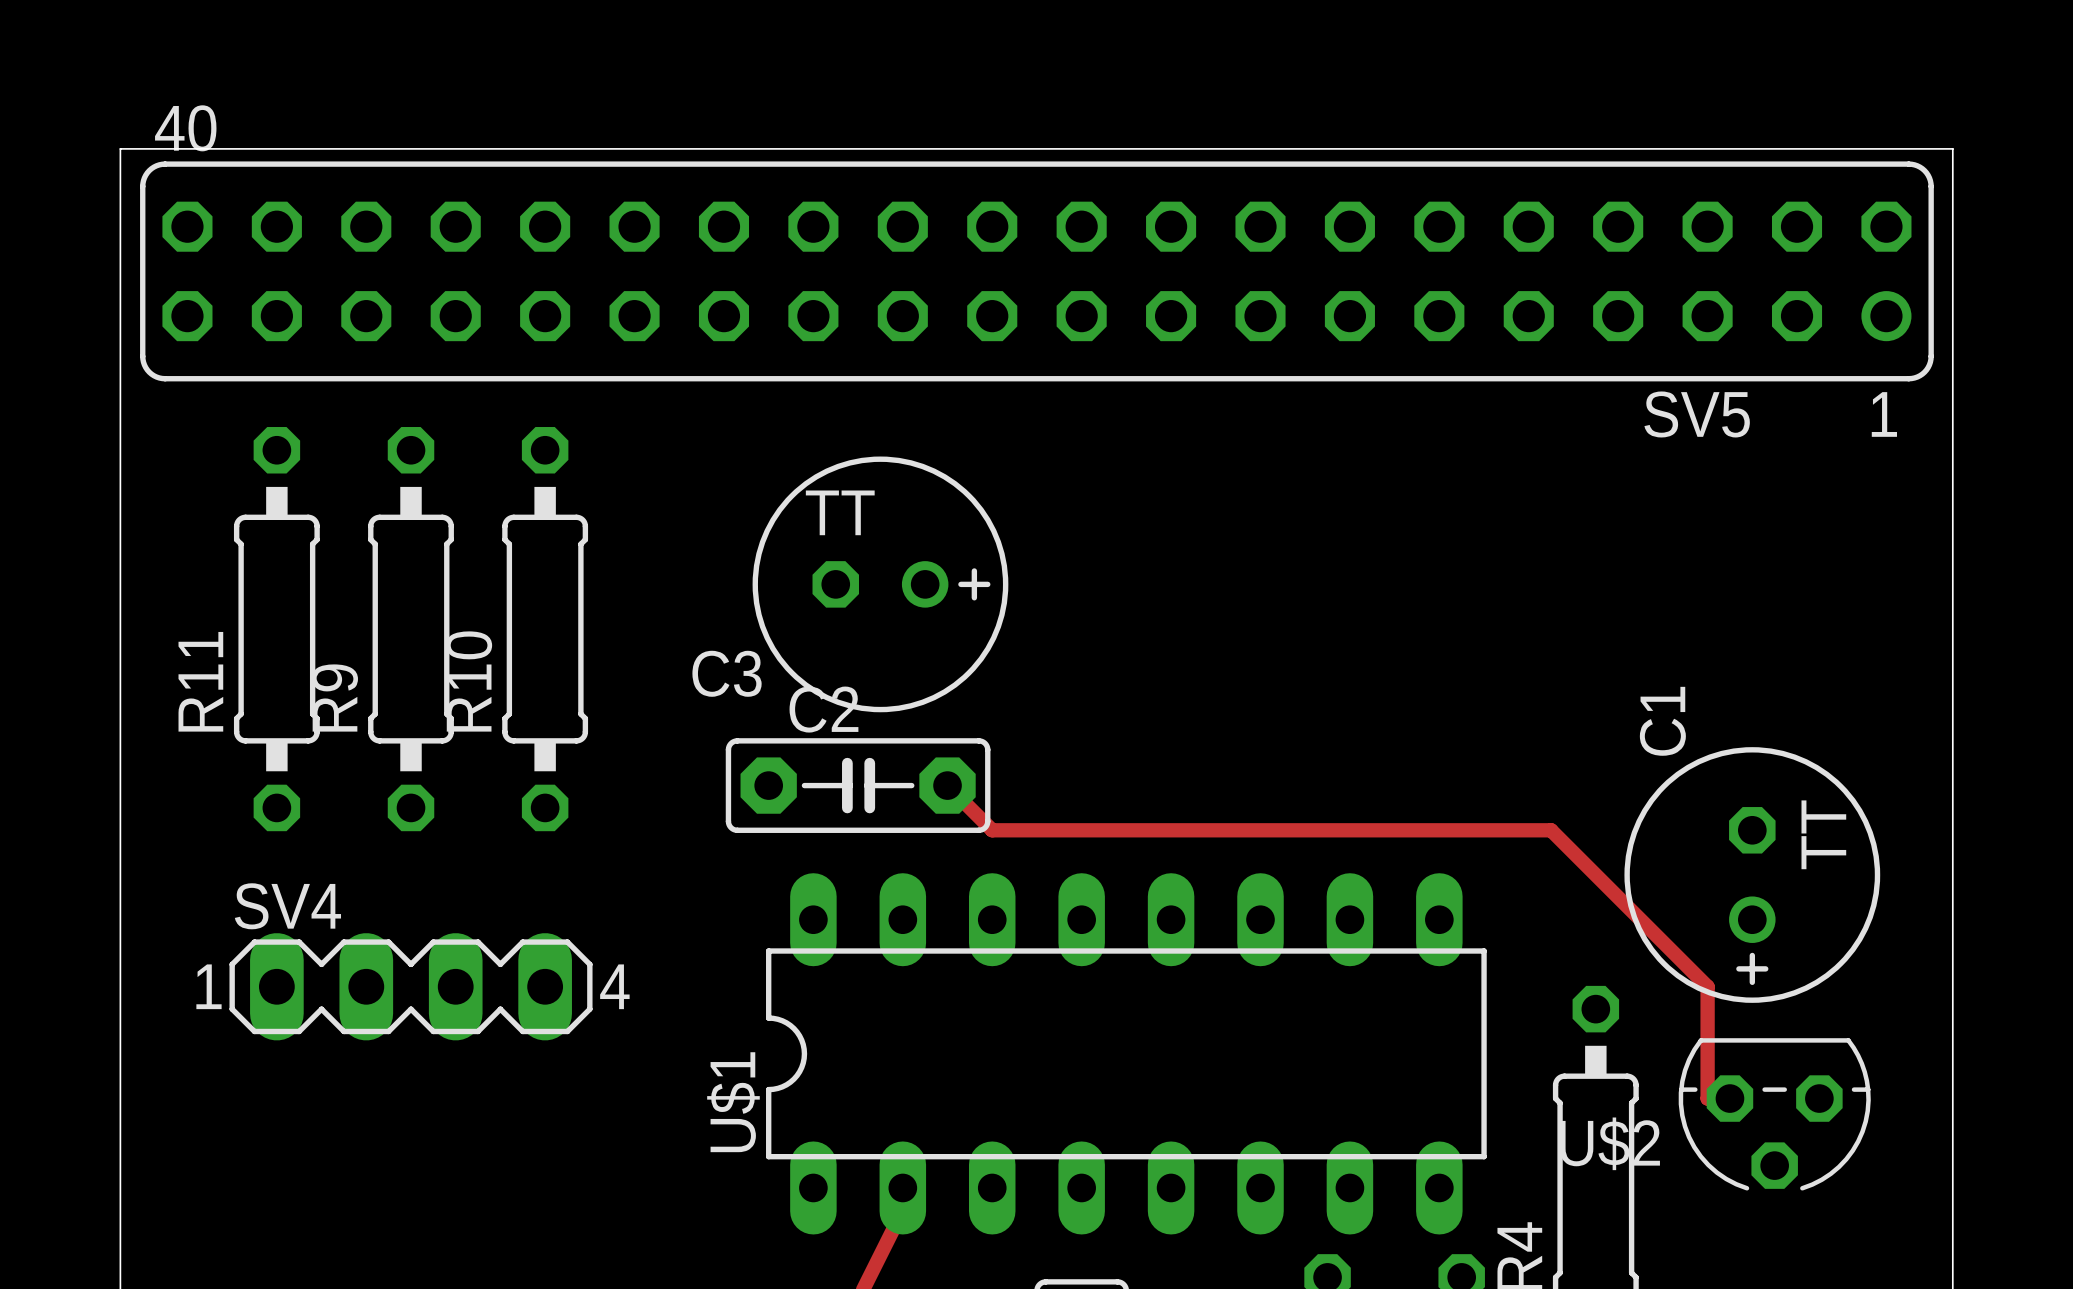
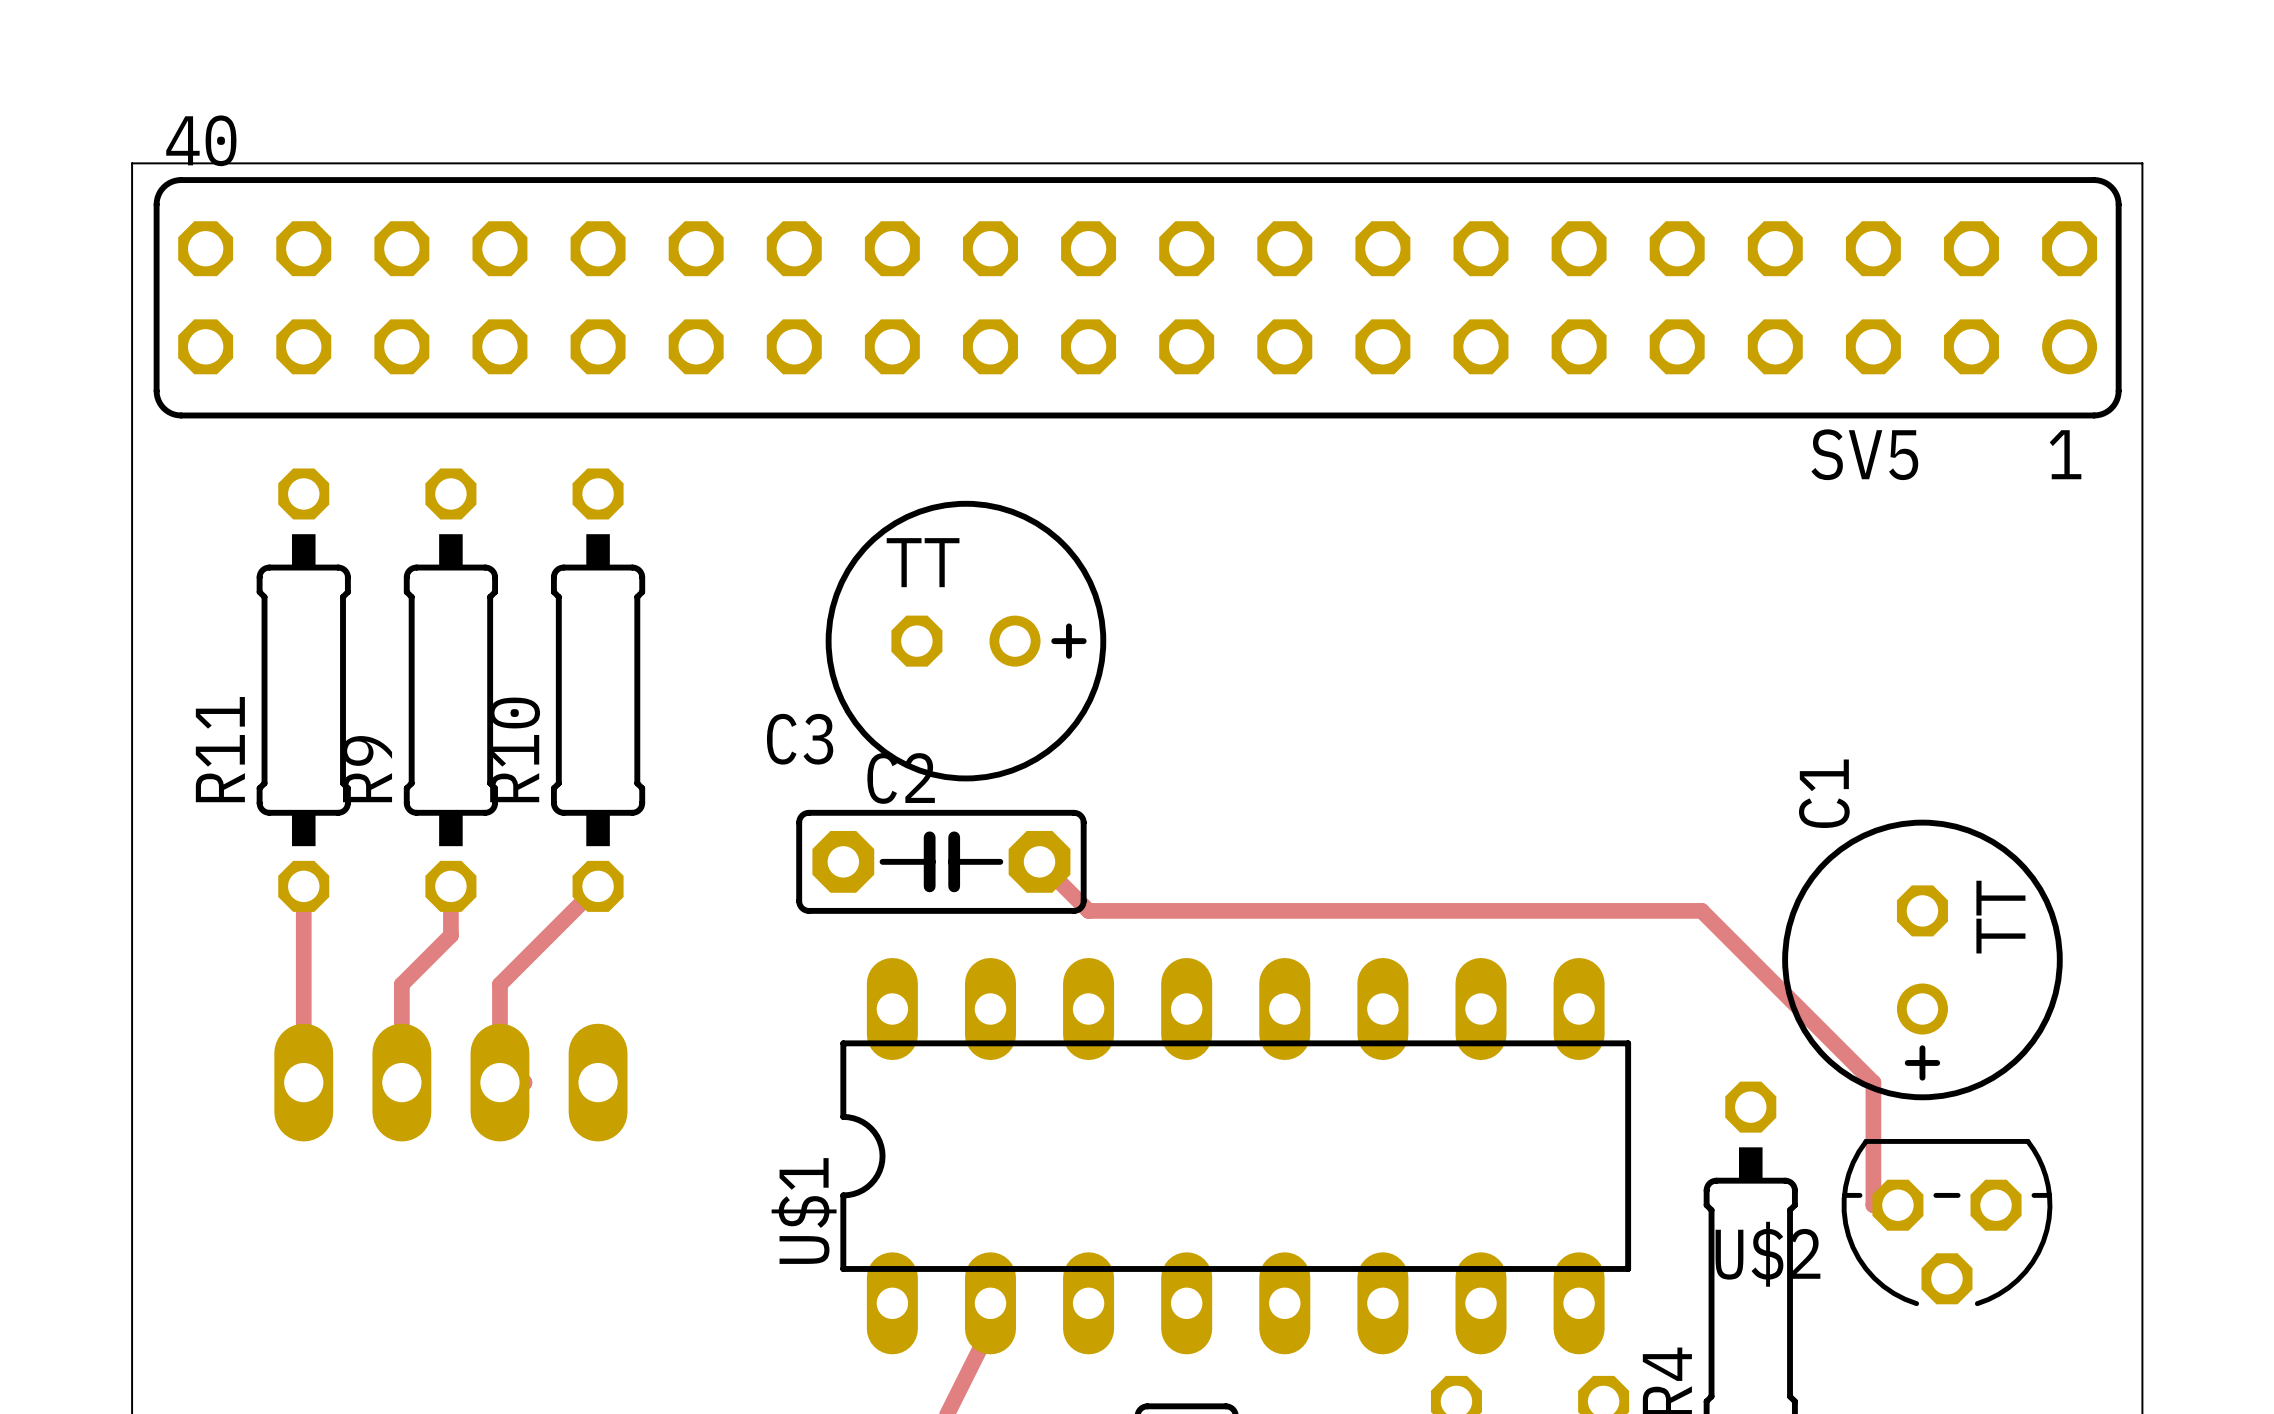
track: none -> (303, 886) (303, 1107)
track: none -> (450, 886) (450, 935) (401, 984) (401, 1082)
track: none -> (598, 886) (499, 984) (499, 1058) (524, 1082) (499, 1082)
SV4 side: top (411, 986) -> bottom (450, 1082)

